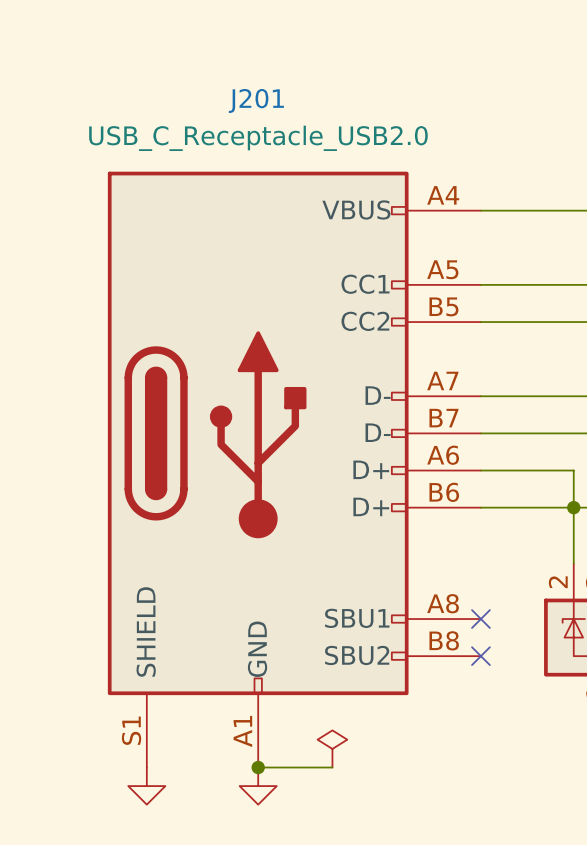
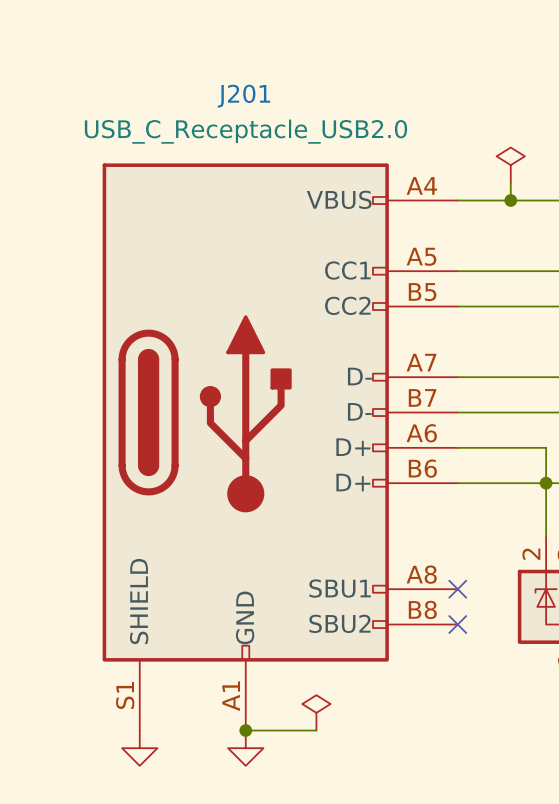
power symbol: none -> (510, 165)
wire: none -> (510, 182) (510, 200)
junction: none -> (510, 200)

